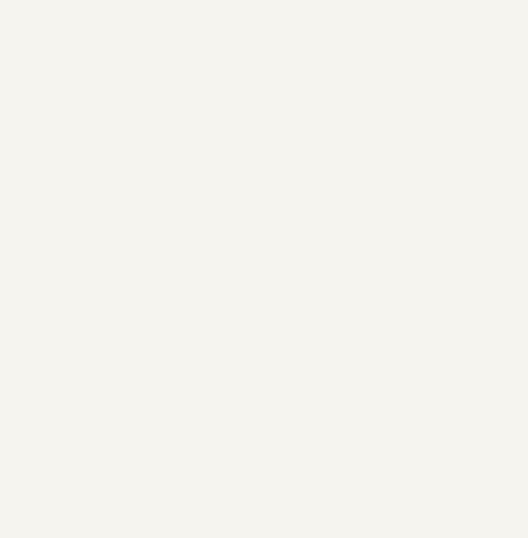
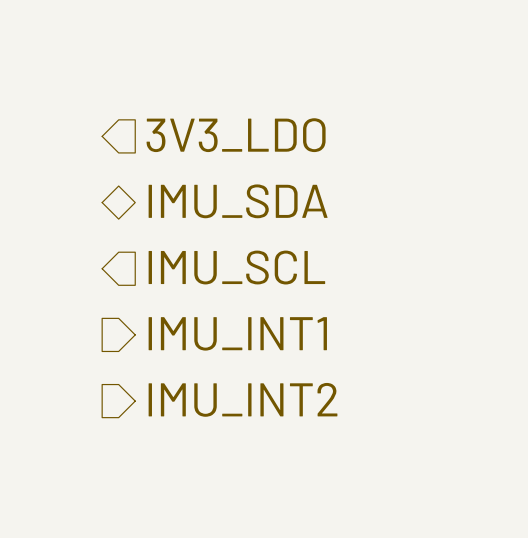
hierarchical label: none -> 3V3_LDO (236, 135)
hierarchical label: none -> IMU_SDA (238, 201)
hierarchical label: none -> IMU_SCL (236, 267)
hierarchical label: none -> IMU_INT1 (237, 333)
hierarchical label: none -> IMU_INT2 (243, 399)

